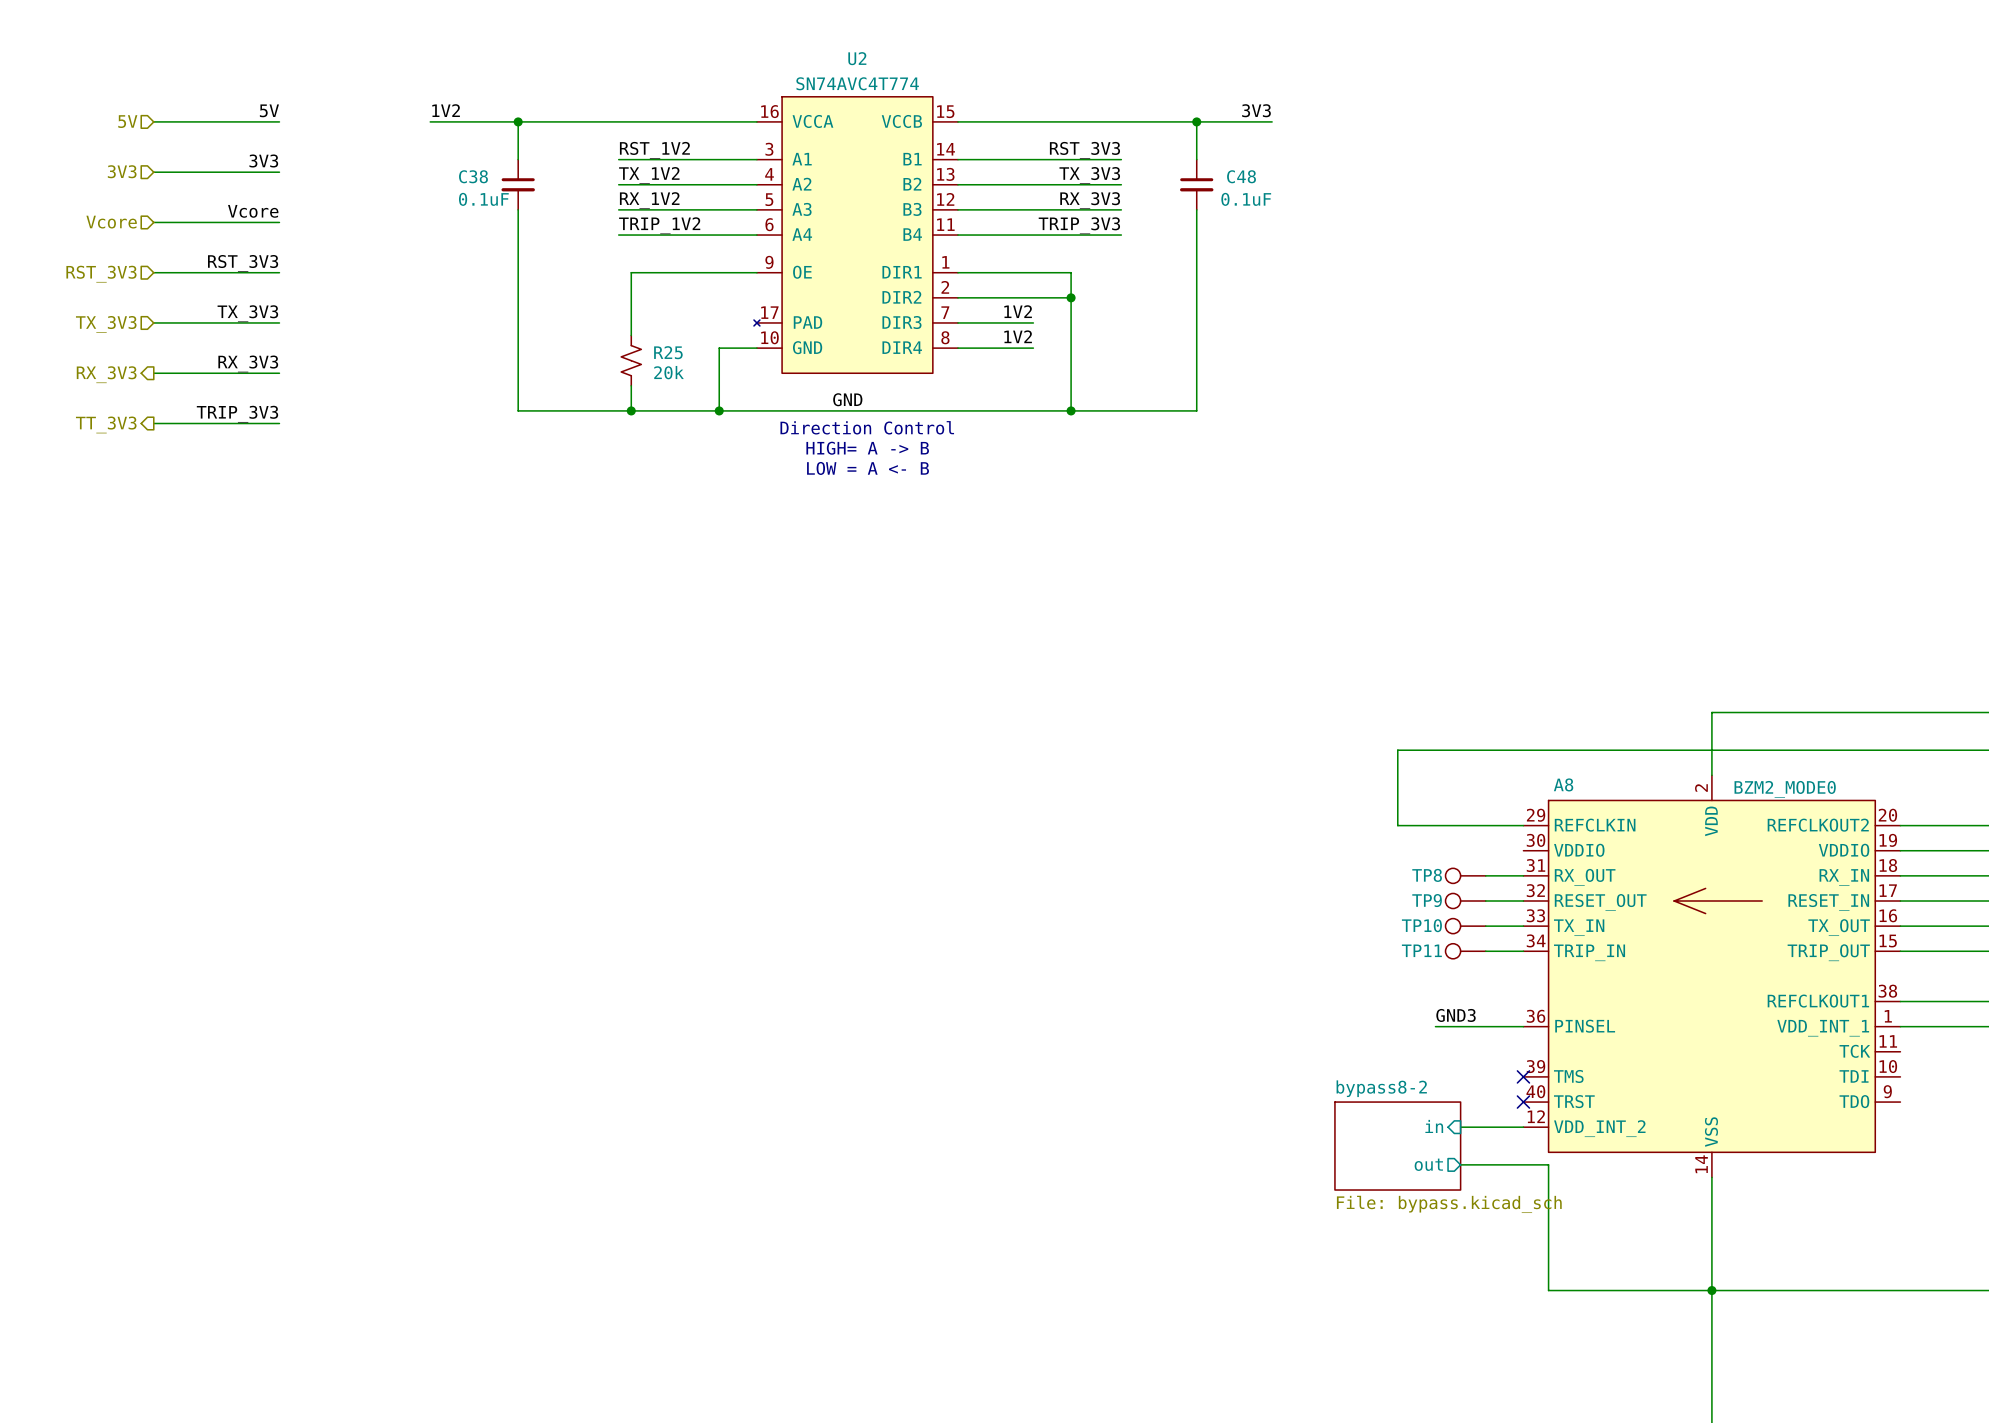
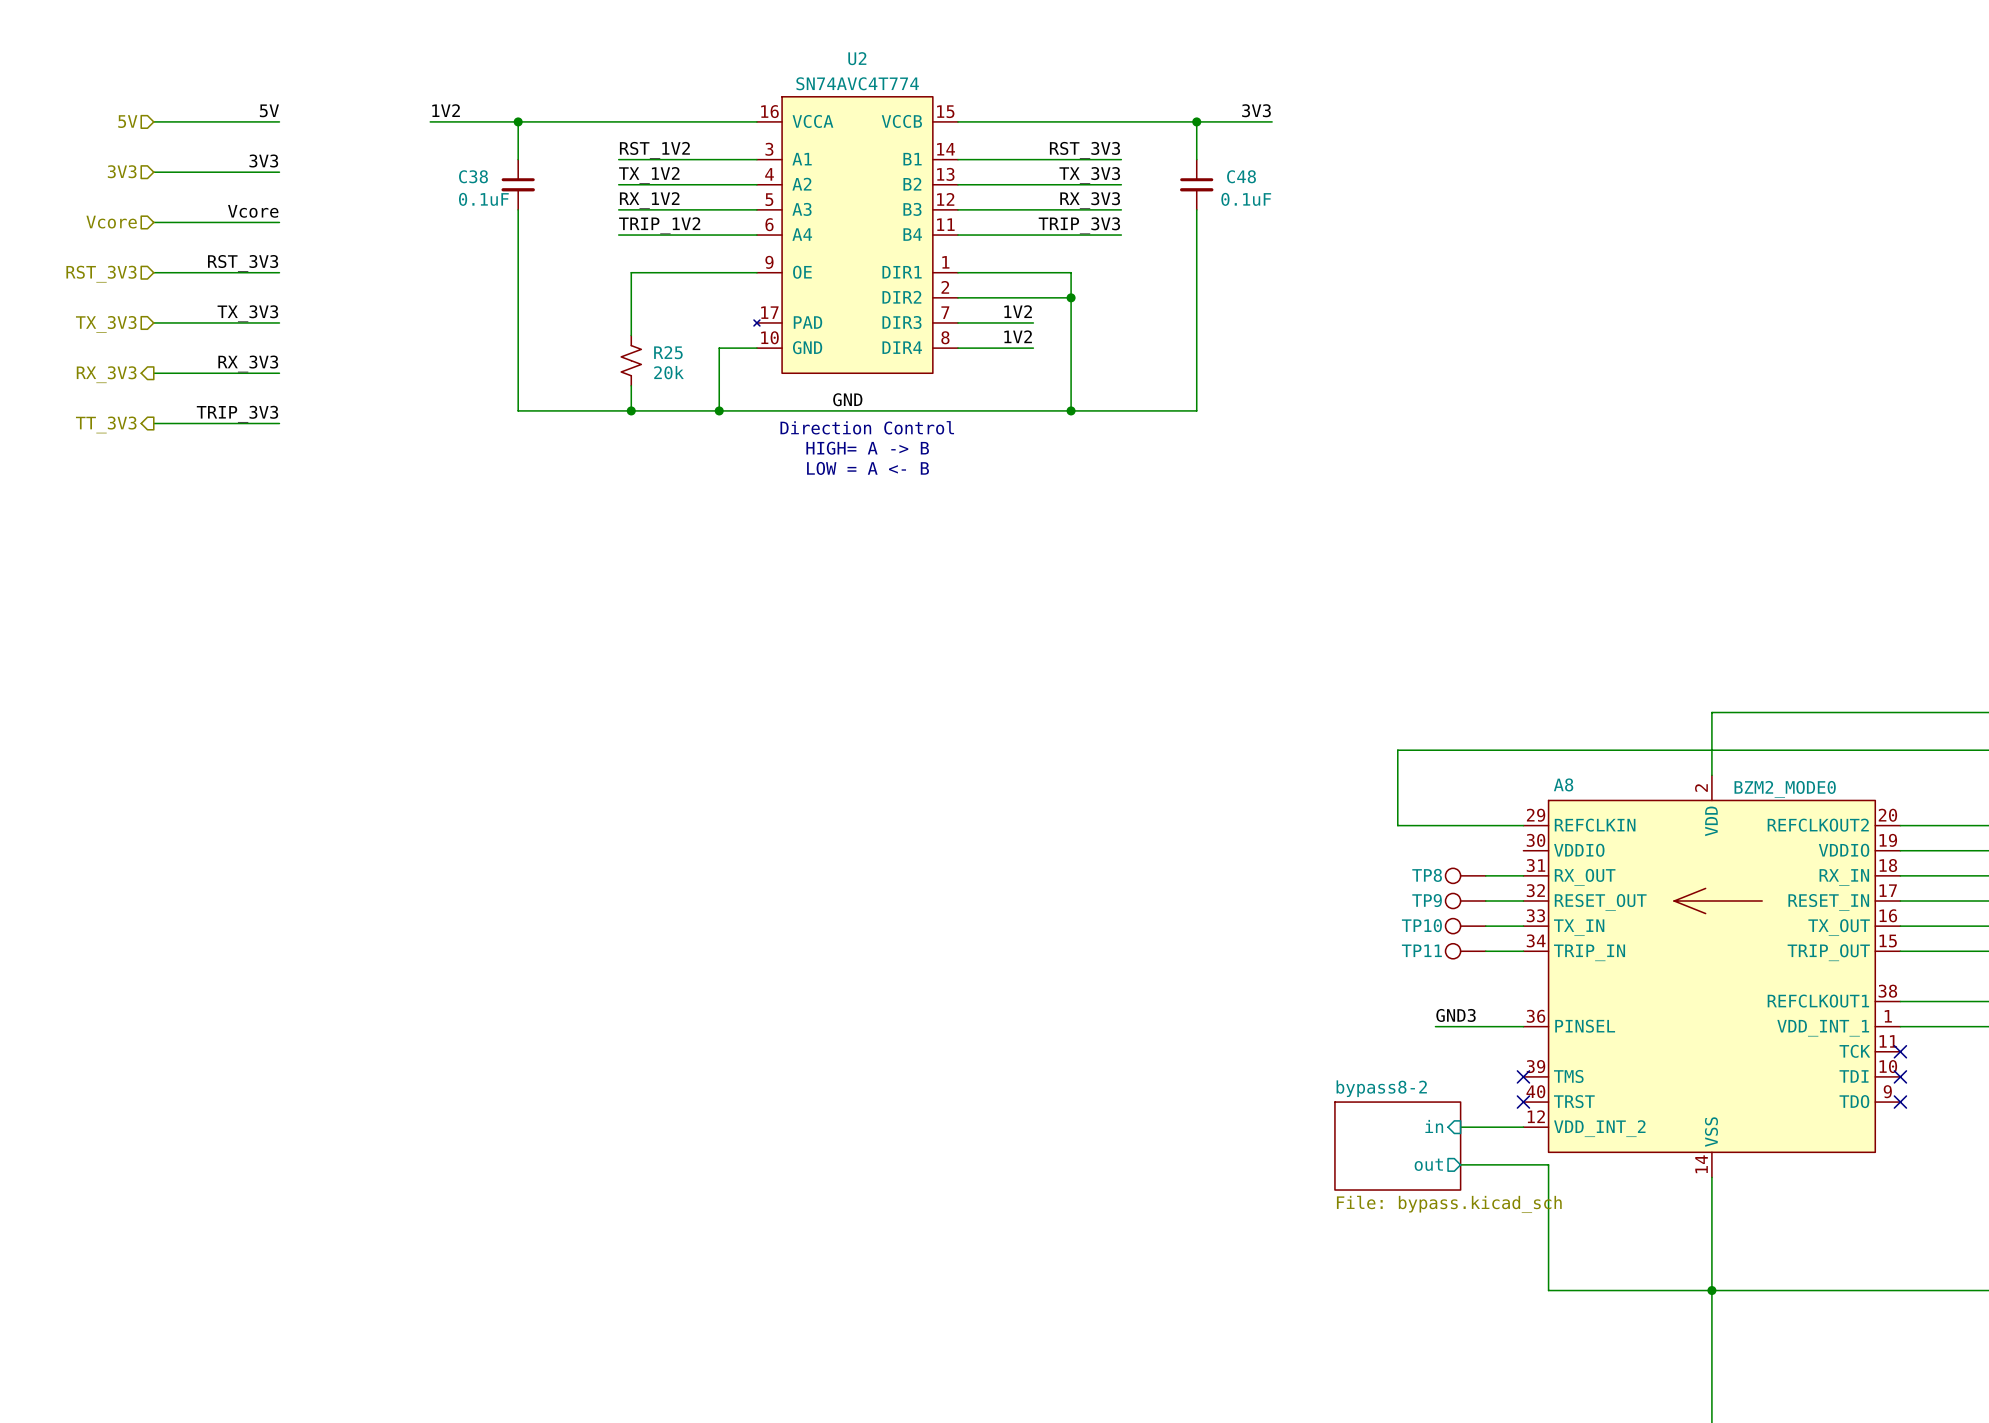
no-connect mark: none -> (1900, 1051)
no-connect mark: none -> (1900, 1076)
no-connect mark: none -> (1900, 1102)

